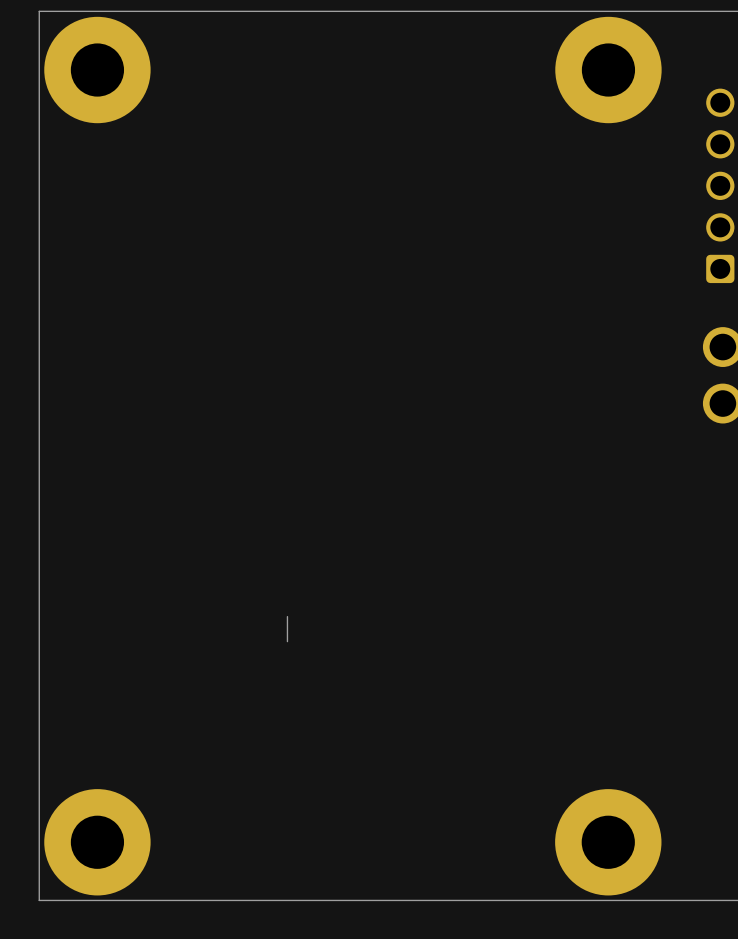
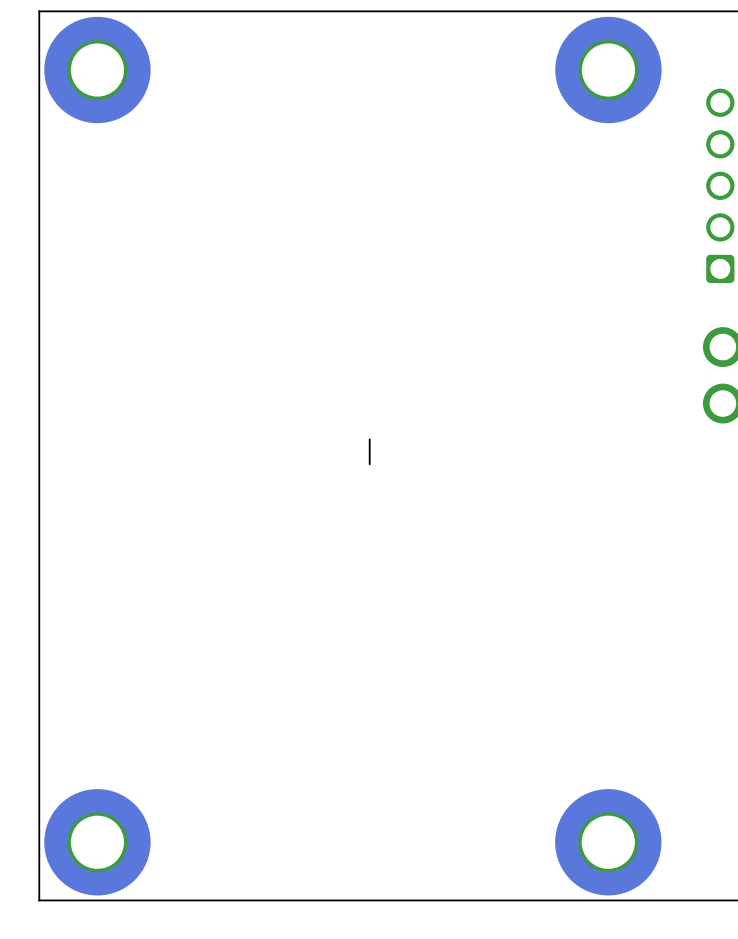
board edge: (287, 616) (287, 641) -> (369, 439) (369, 464)

